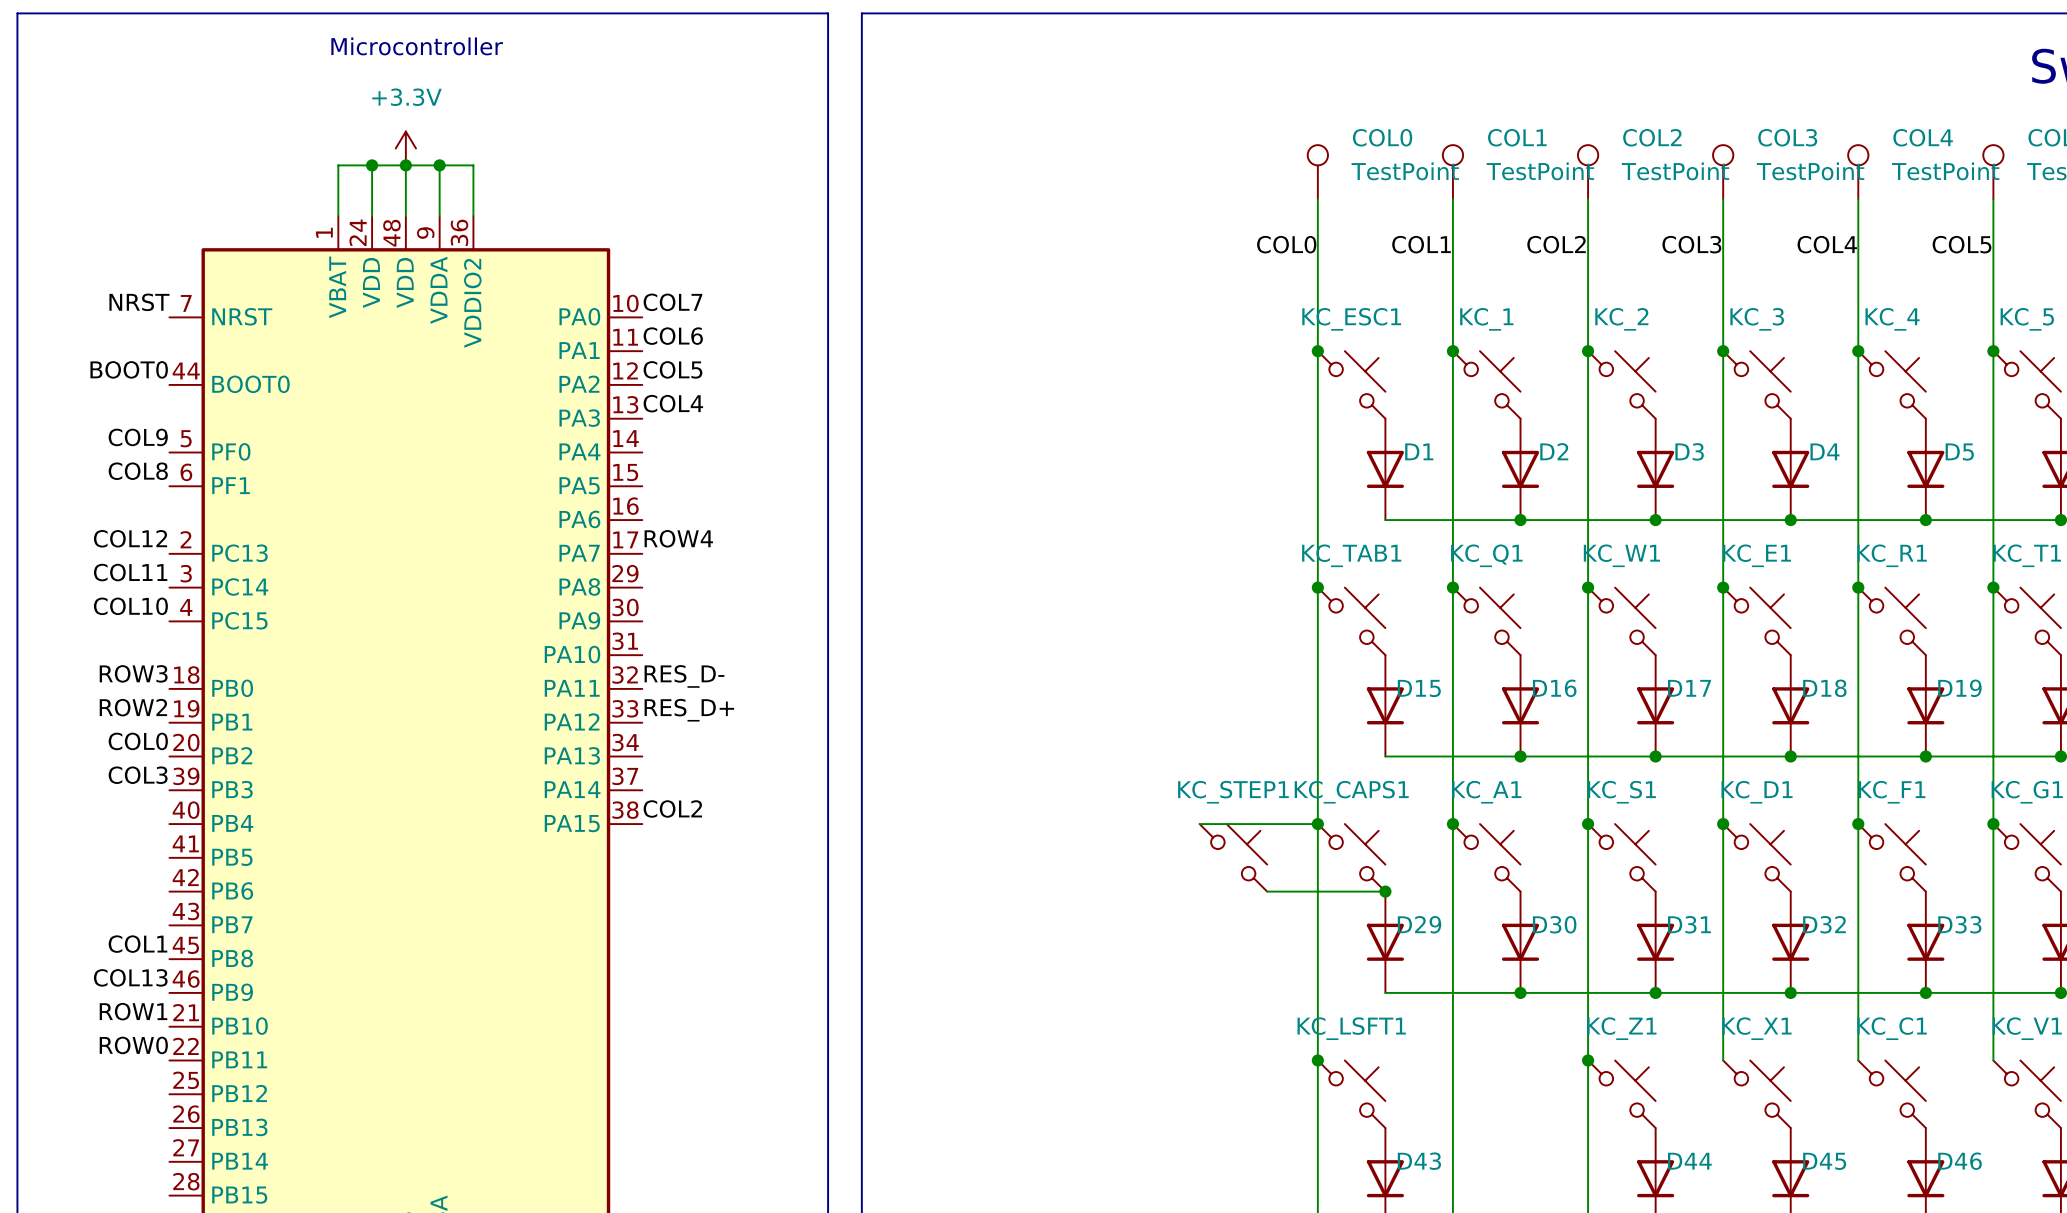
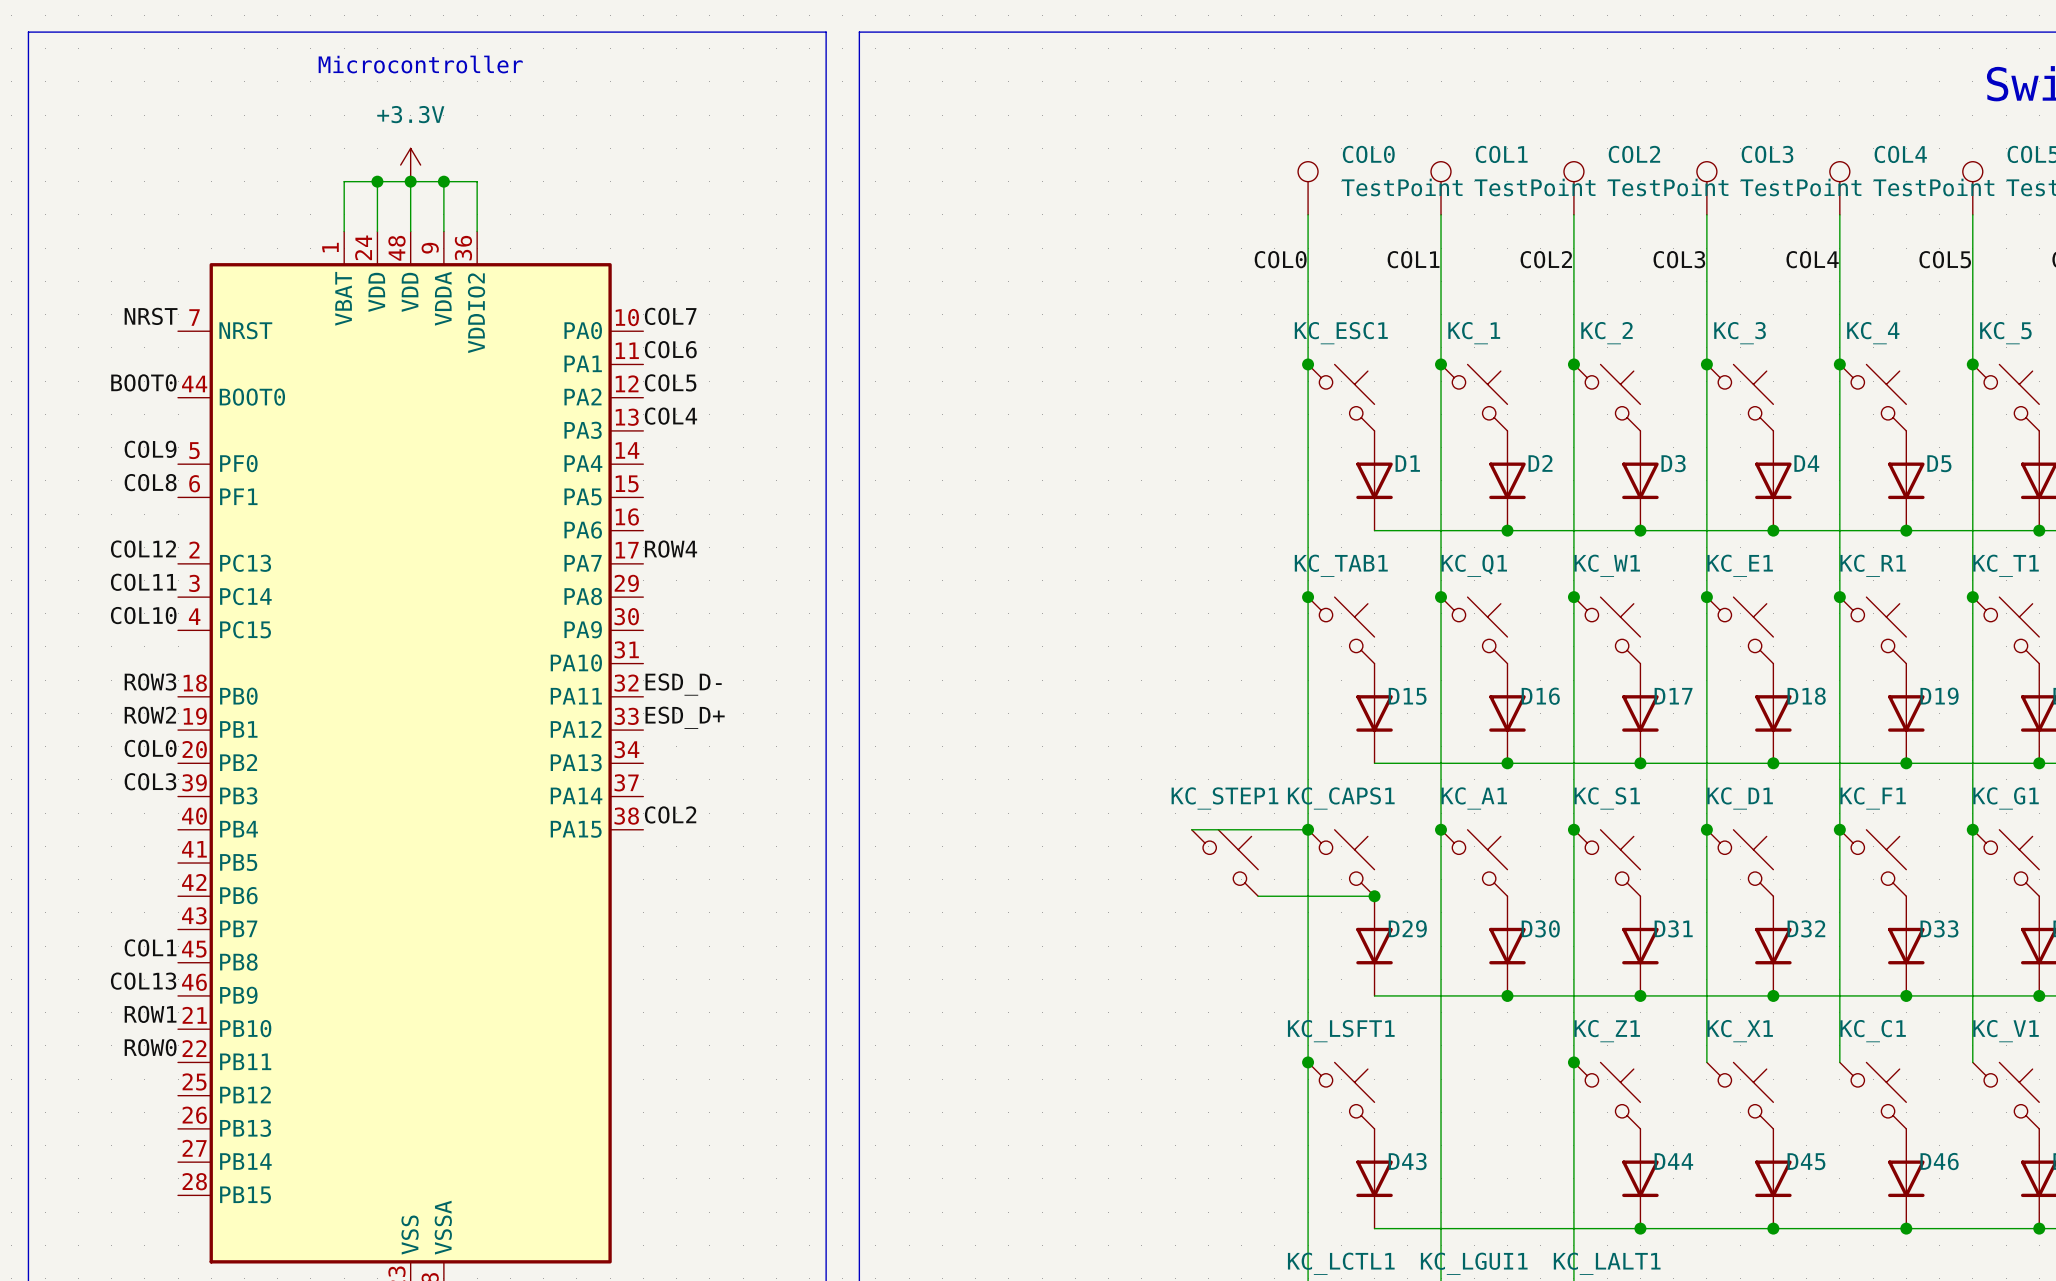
label: RES_D- (684, 676) -> ESD_D- (683, 684)
label: RES_D+ (689, 710) -> ESD_D+ (685, 717)

